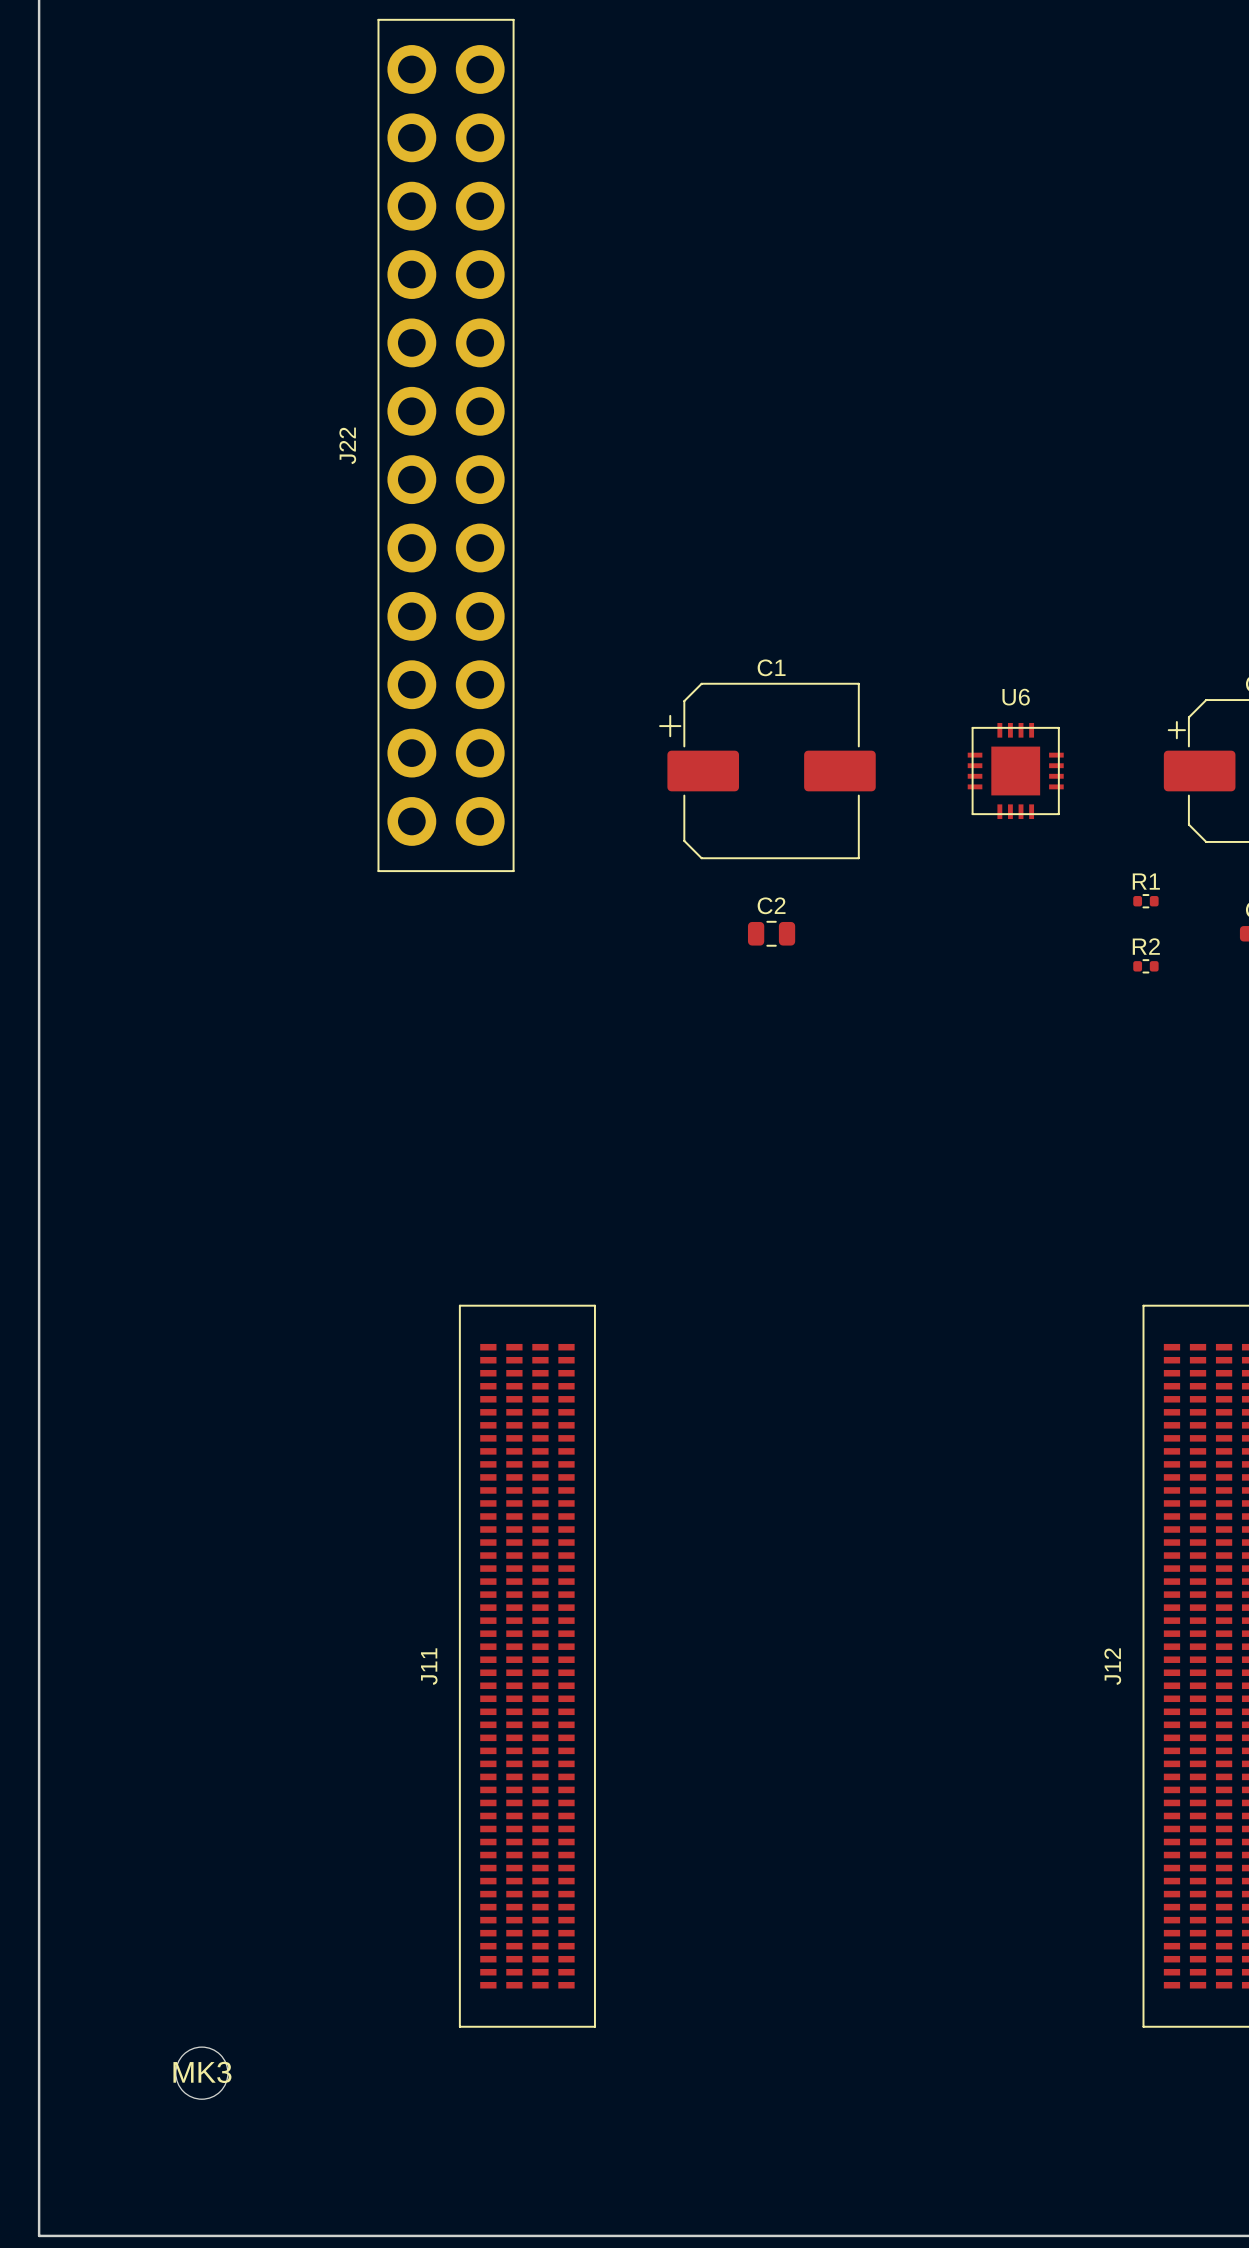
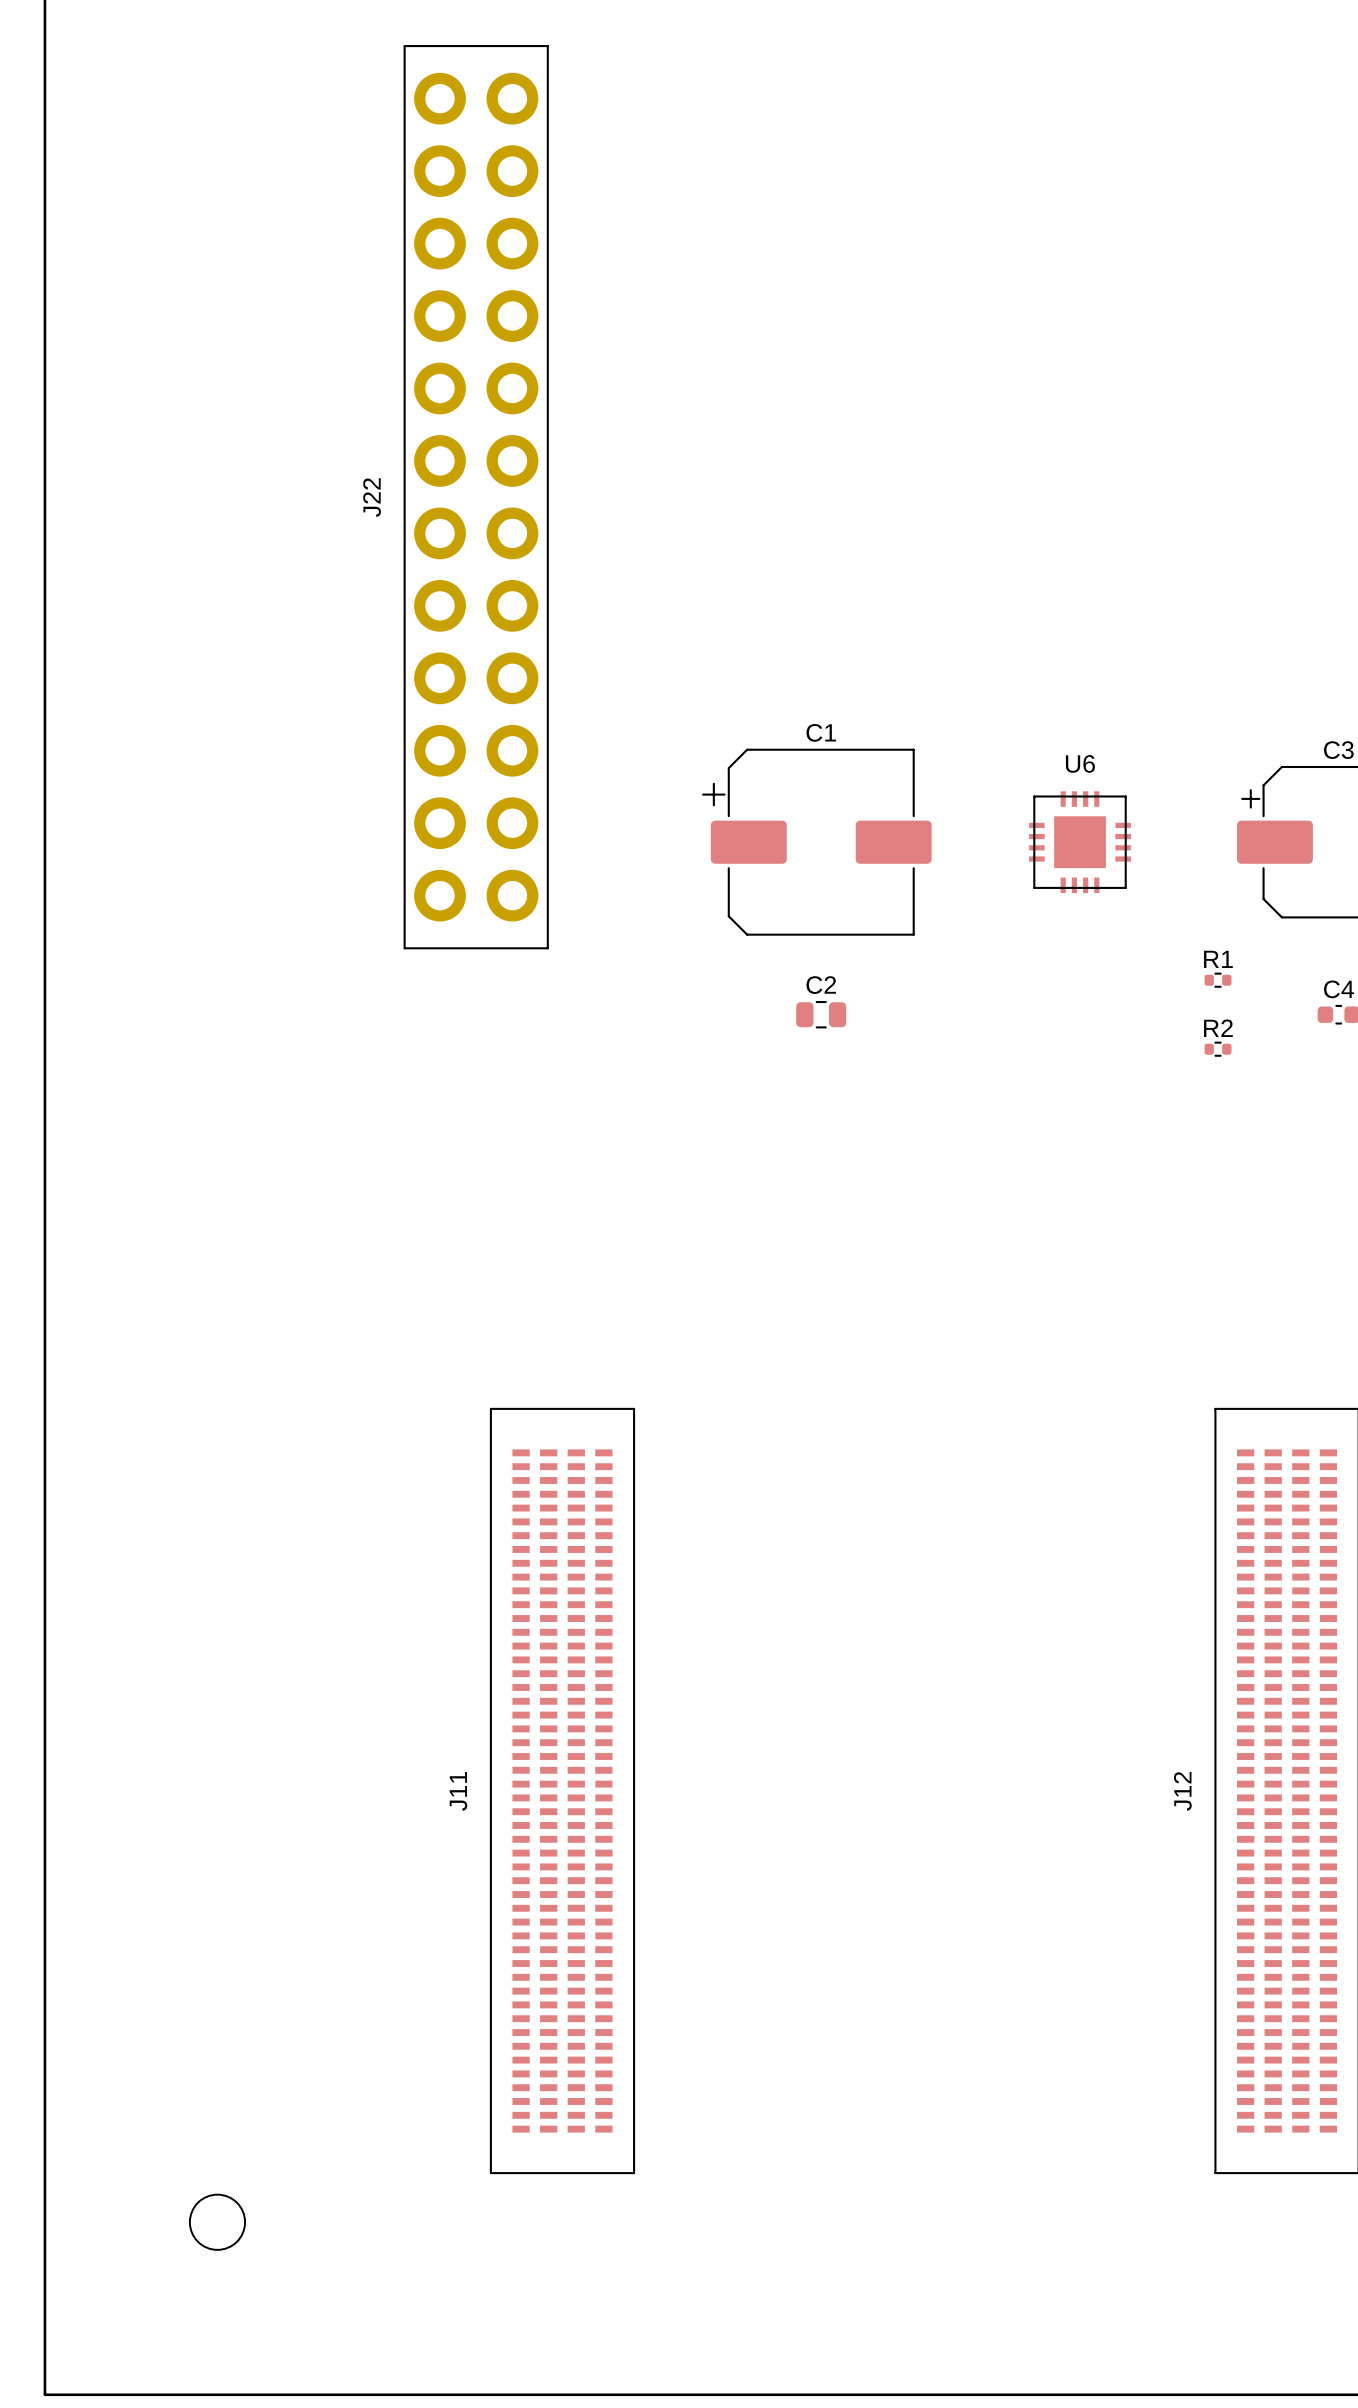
MK3 name: MK3 (202, 2072) -> none

